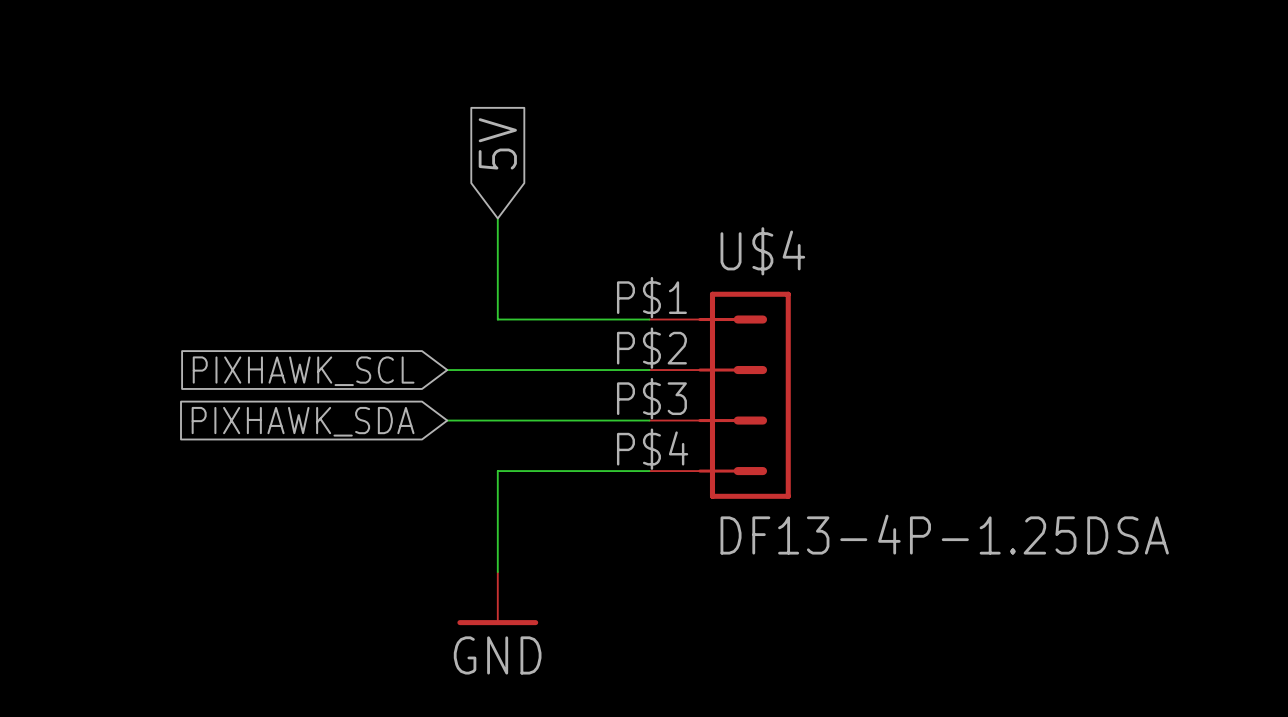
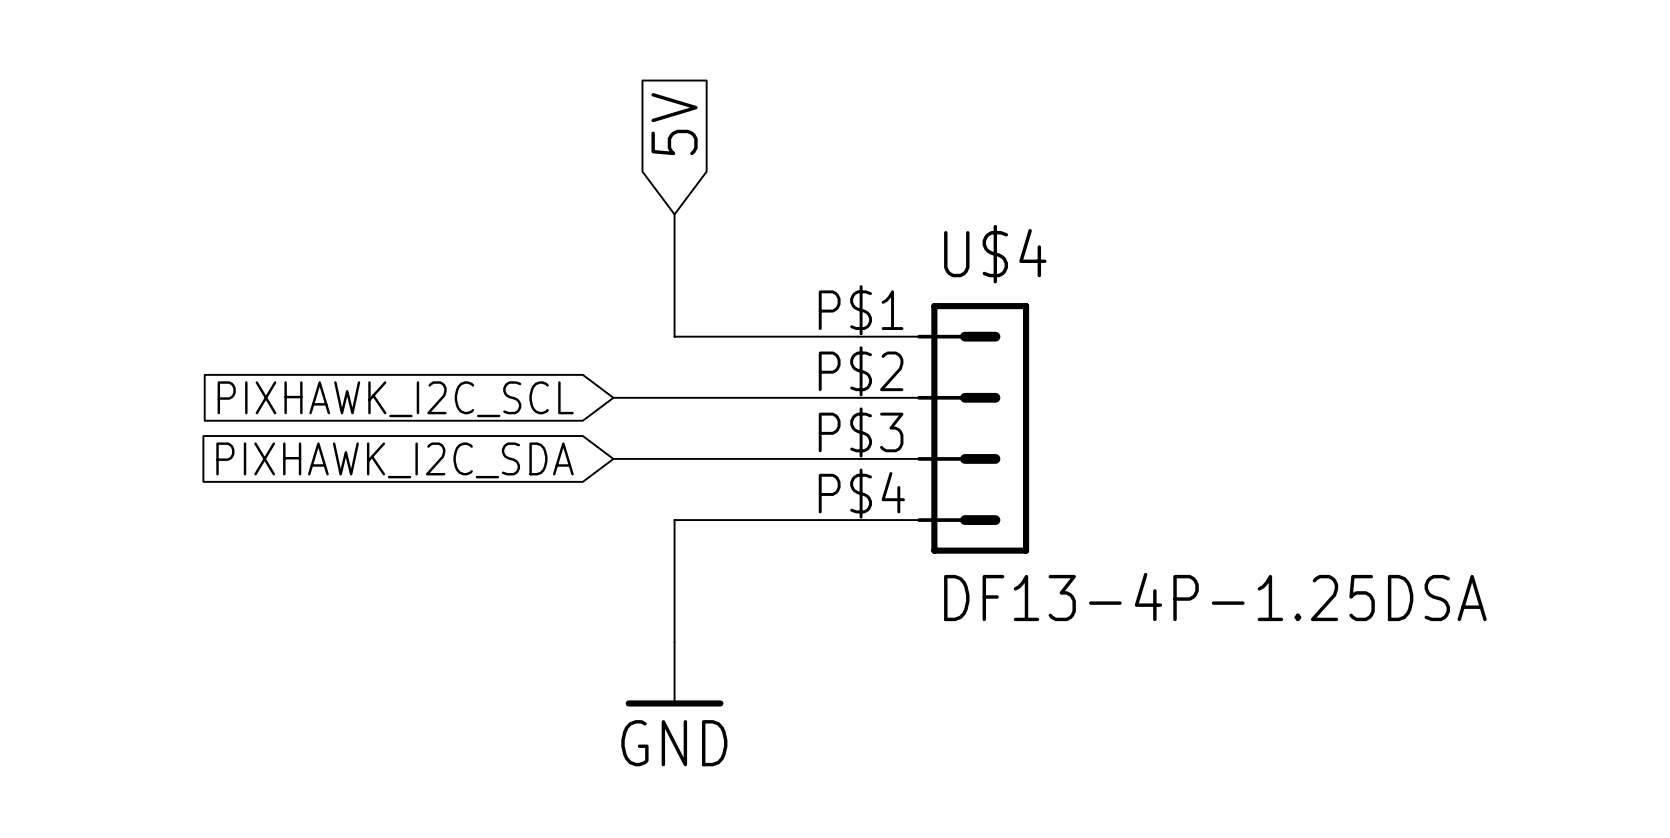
global label: PIXHAWK_SCL (303, 371) -> PIXHAWK_I2C_SCL (395, 399)
global label: PIXHAWK_SDA (303, 421) -> PIXHAWK_I2C_SDA (395, 460)

